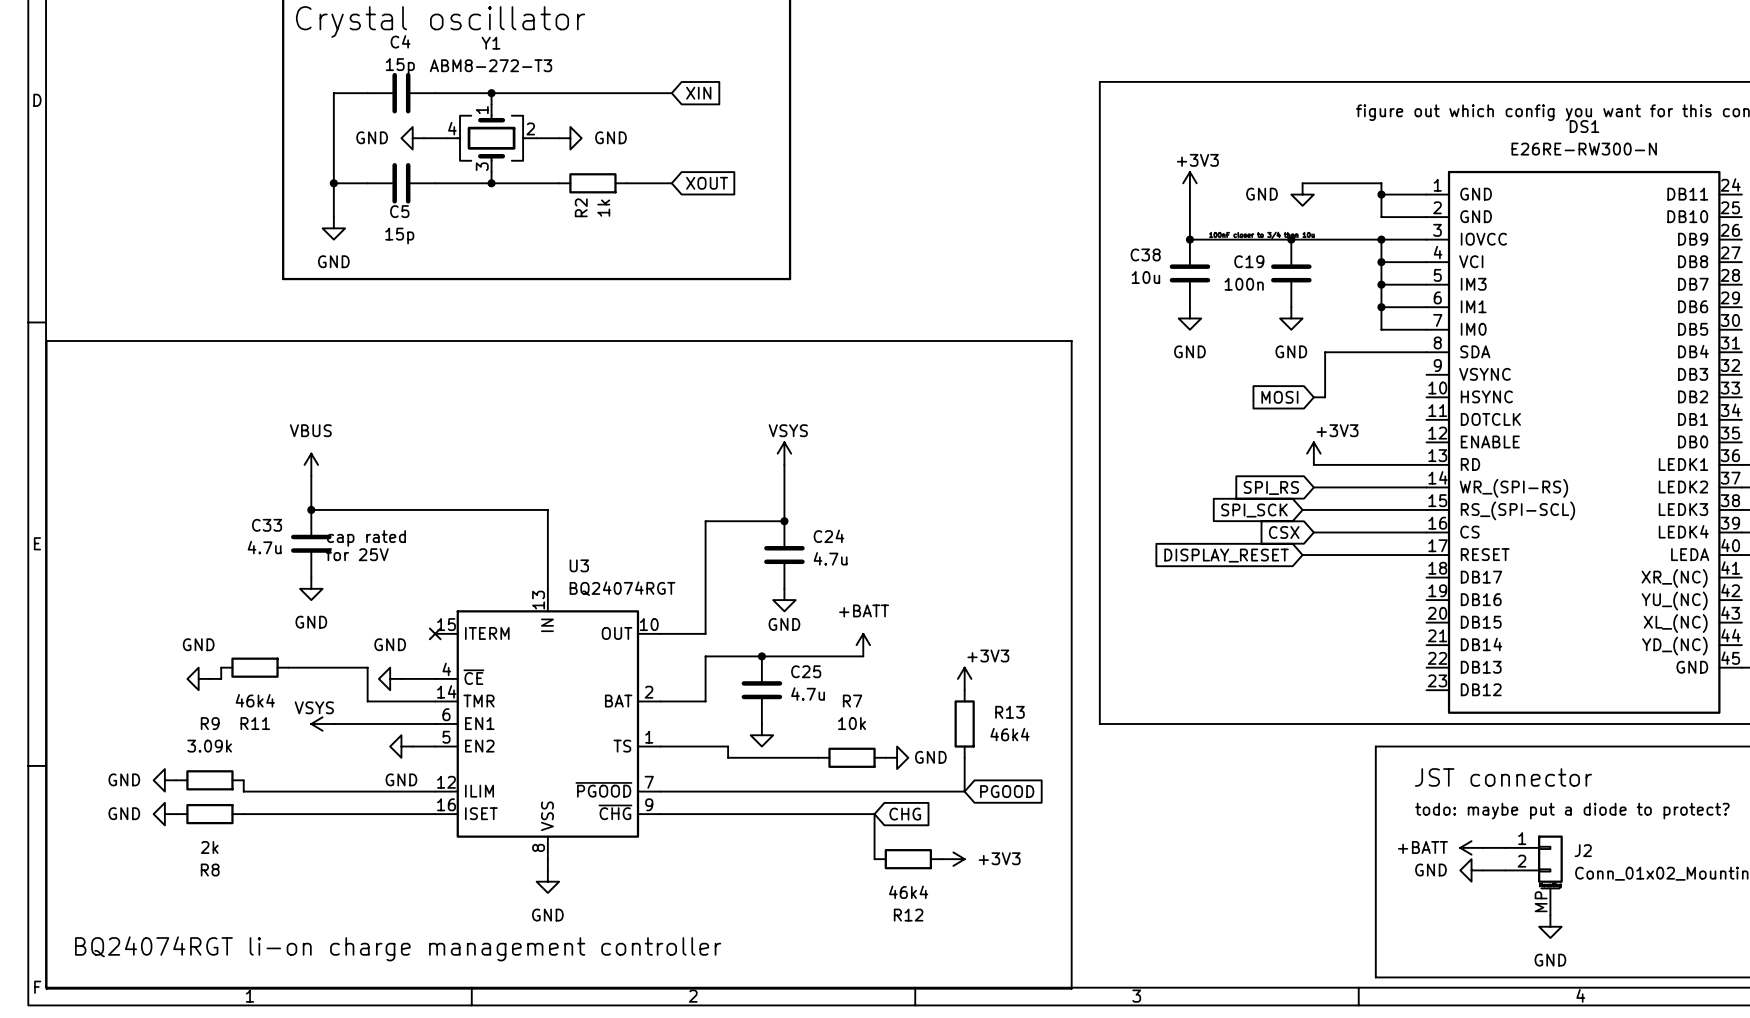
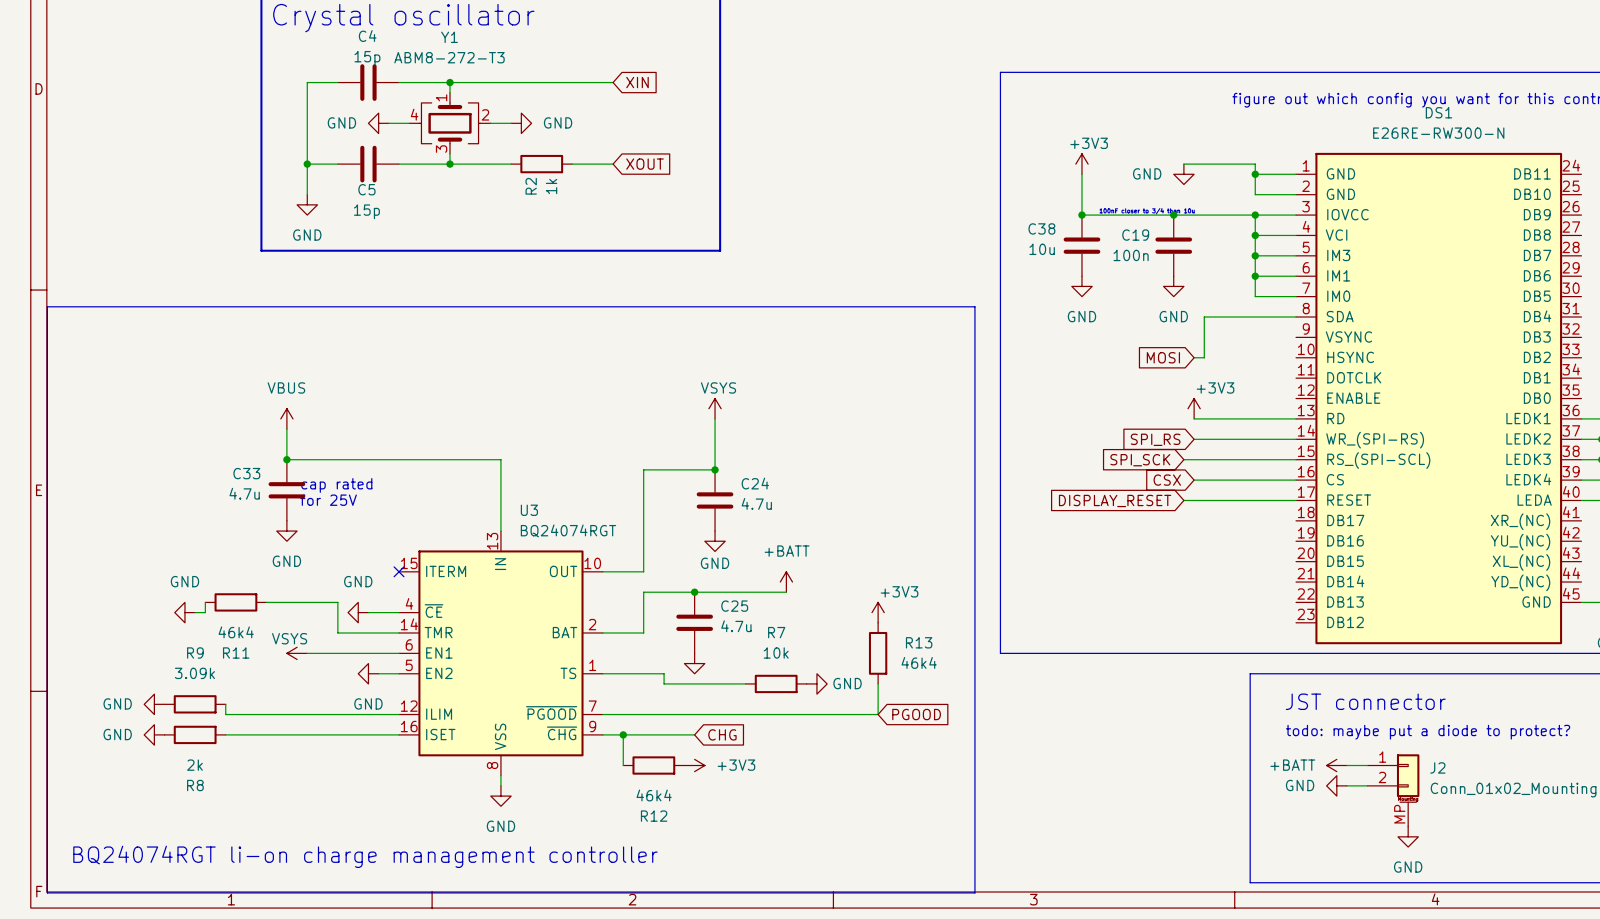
wire: none -> (623, 734) (623, 765)
junction: none -> (623, 734)
wire: (761, 814) (874, 814) (874, 859) -> none
global label position: CHG (905, 814) -> CHG (722, 734)
R12 position: (908, 859) -> (653, 765)
power symbol position: +3V3 (953, 859) -> +3V3 (694, 765)

